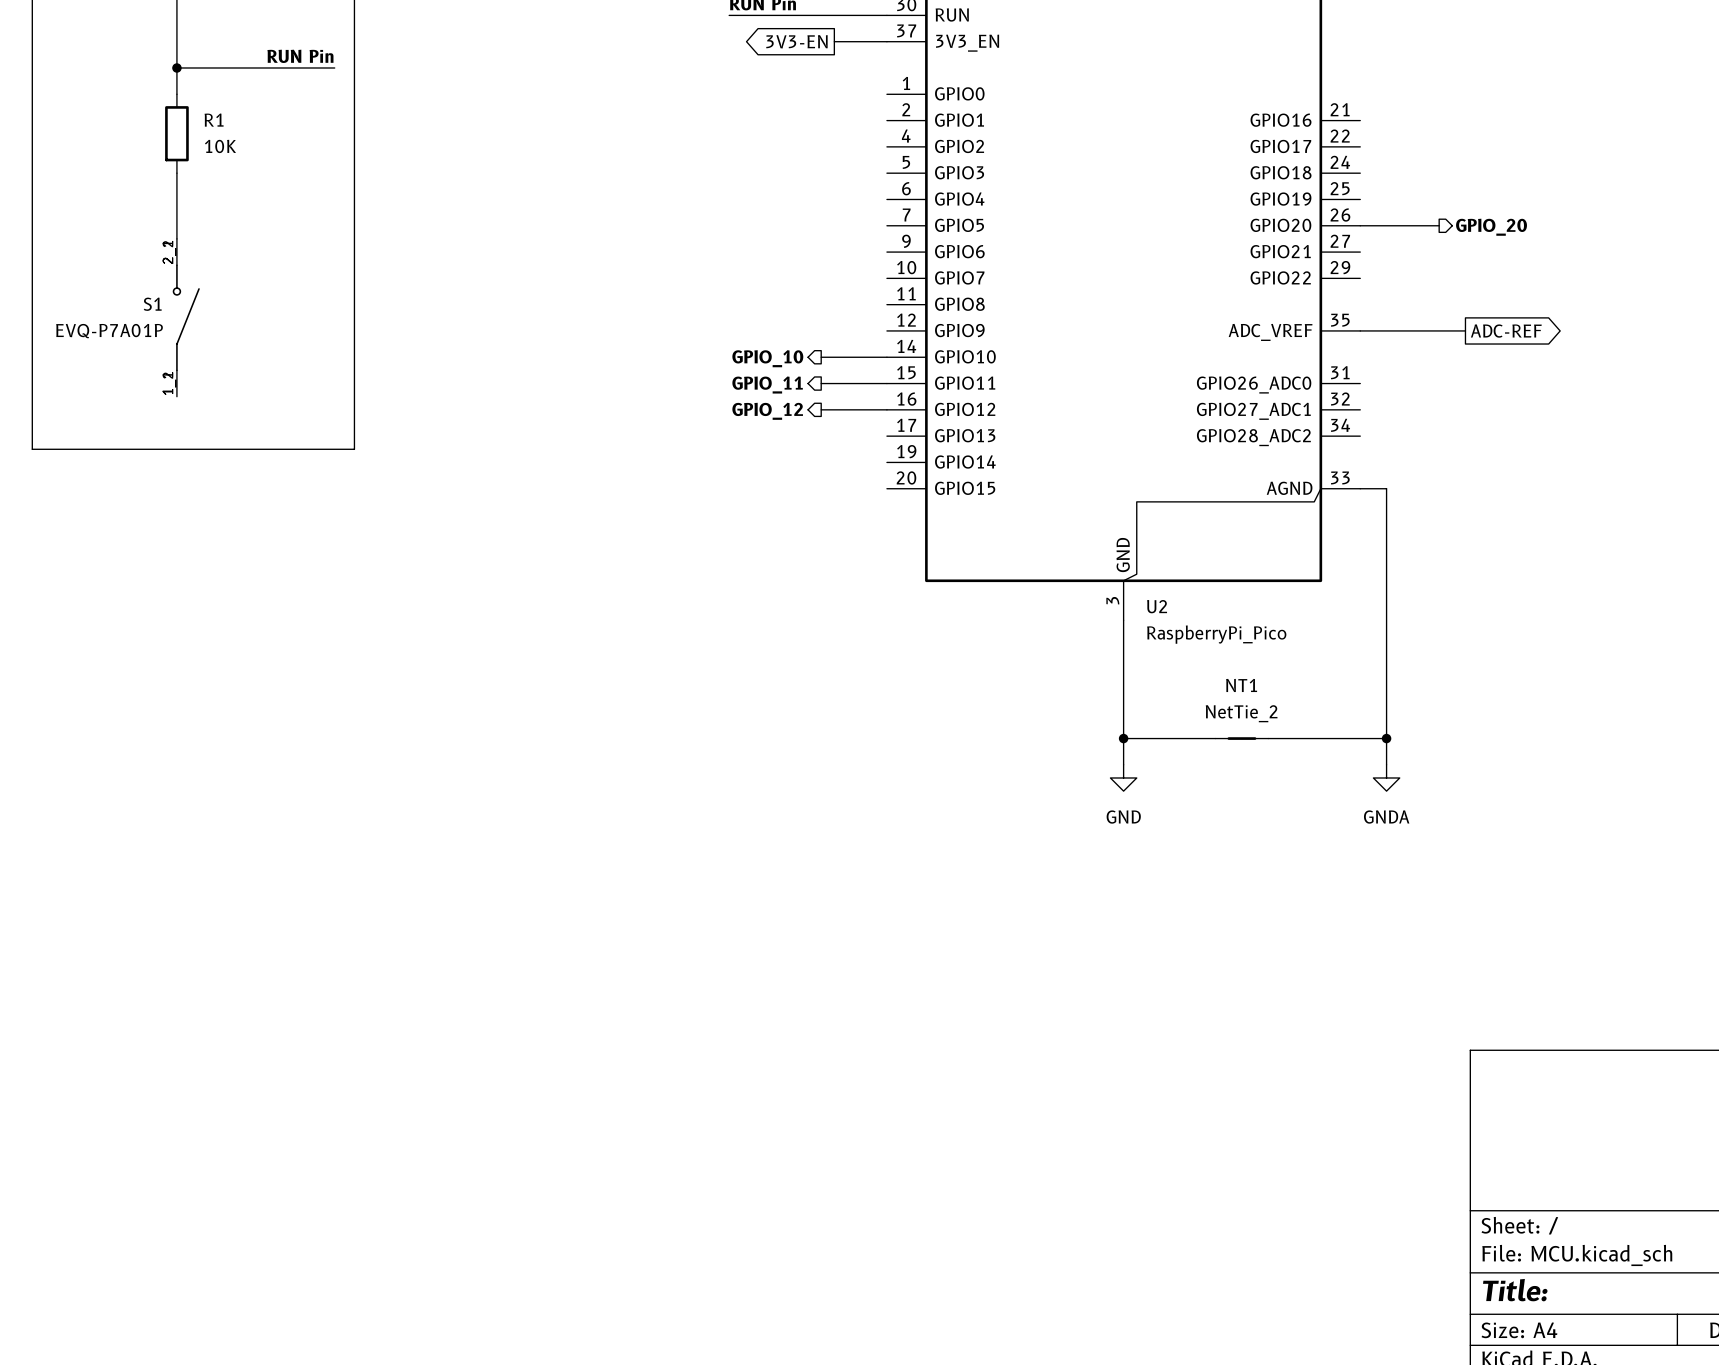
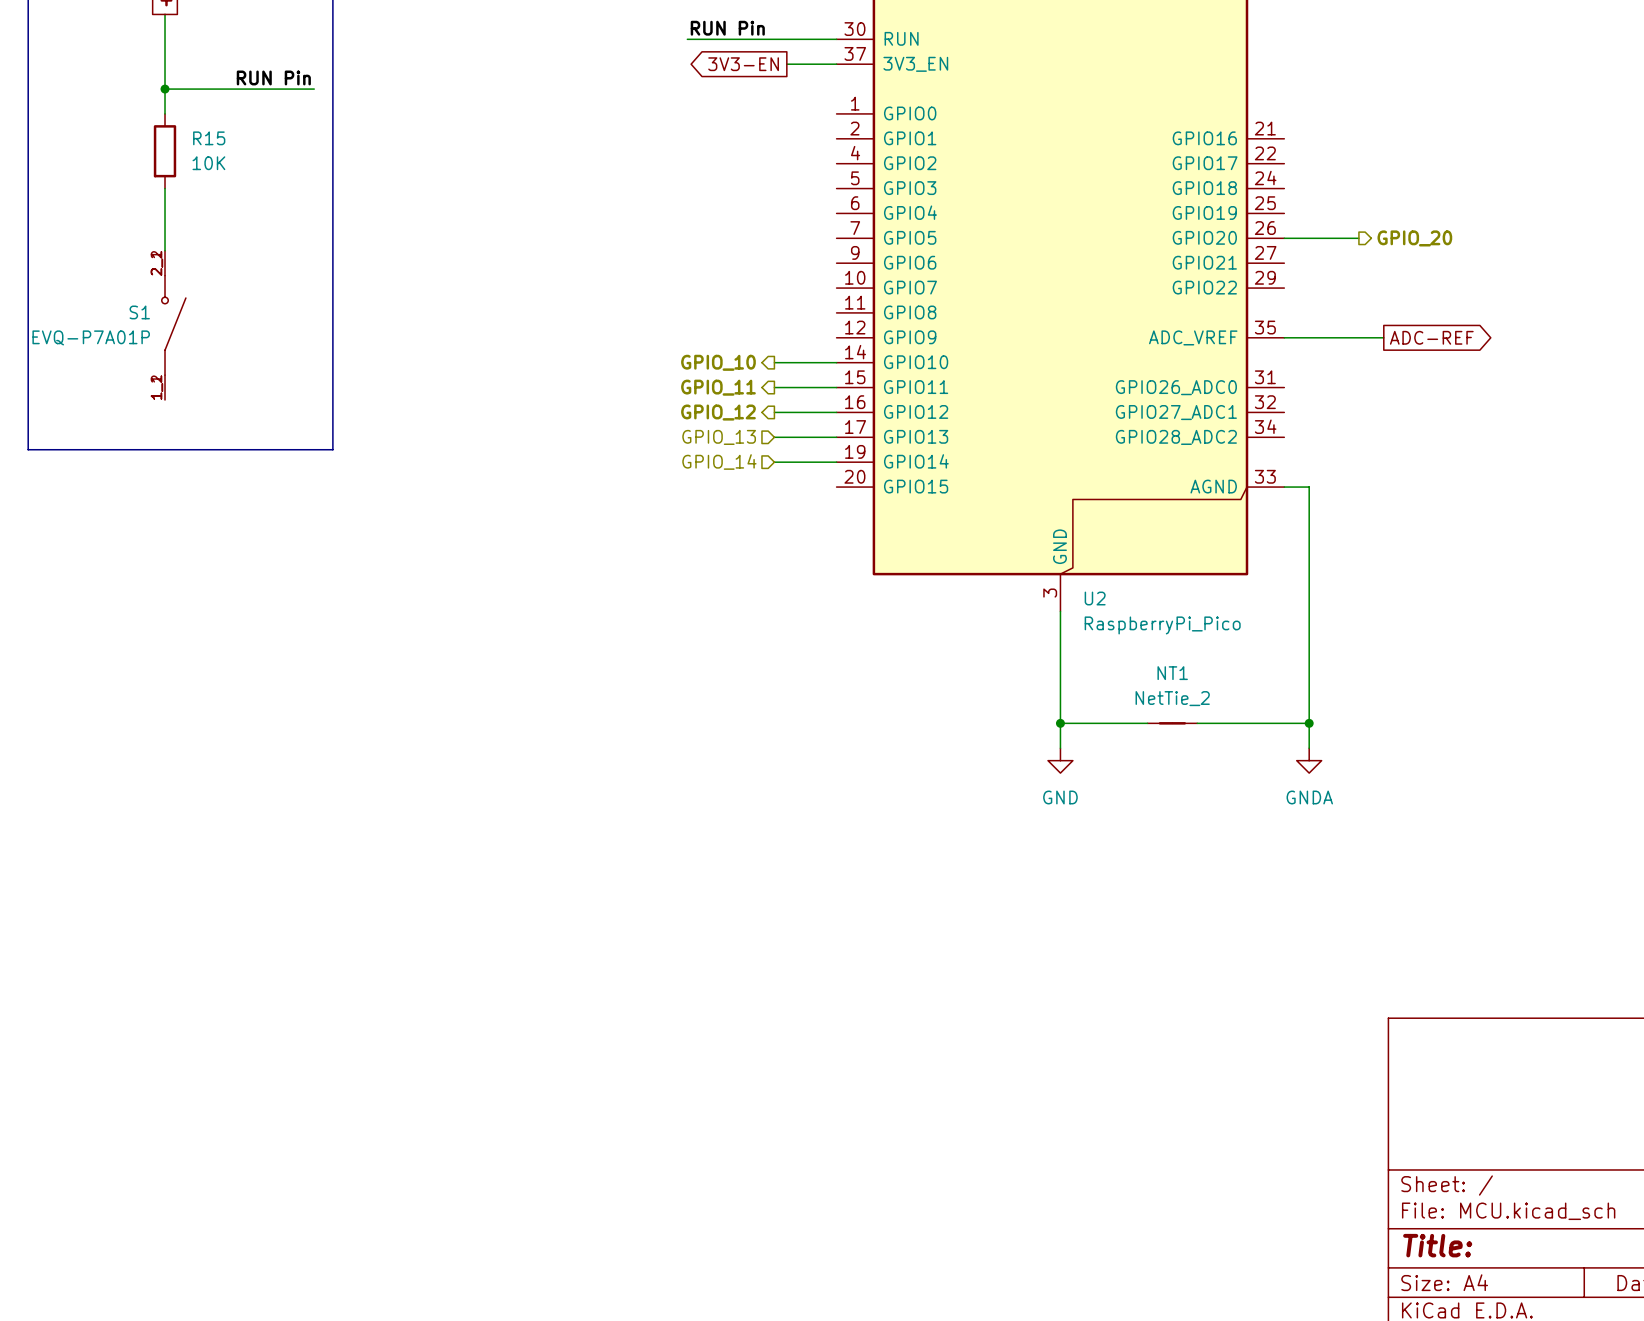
R1 name: R1 (214, 120) -> R15 (209, 138)
wire: none -> (774, 437) (836, 437)
hierarchical label: none -> GPIO_13 (719, 437)
wire: none -> (774, 462) (836, 462)
hierarchical label: none -> GPIO_14 (719, 462)

